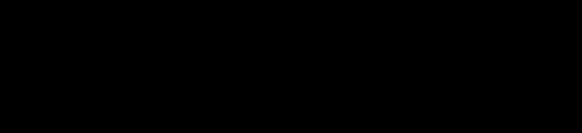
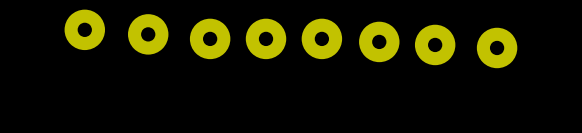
part: none -> (84, 29)
part: none -> (148, 34)
part: none -> (210, 38)
part: none -> (266, 38)
part: none -> (321, 38)
part: none -> (379, 41)
part: none -> (435, 44)
part: none -> (497, 47)

